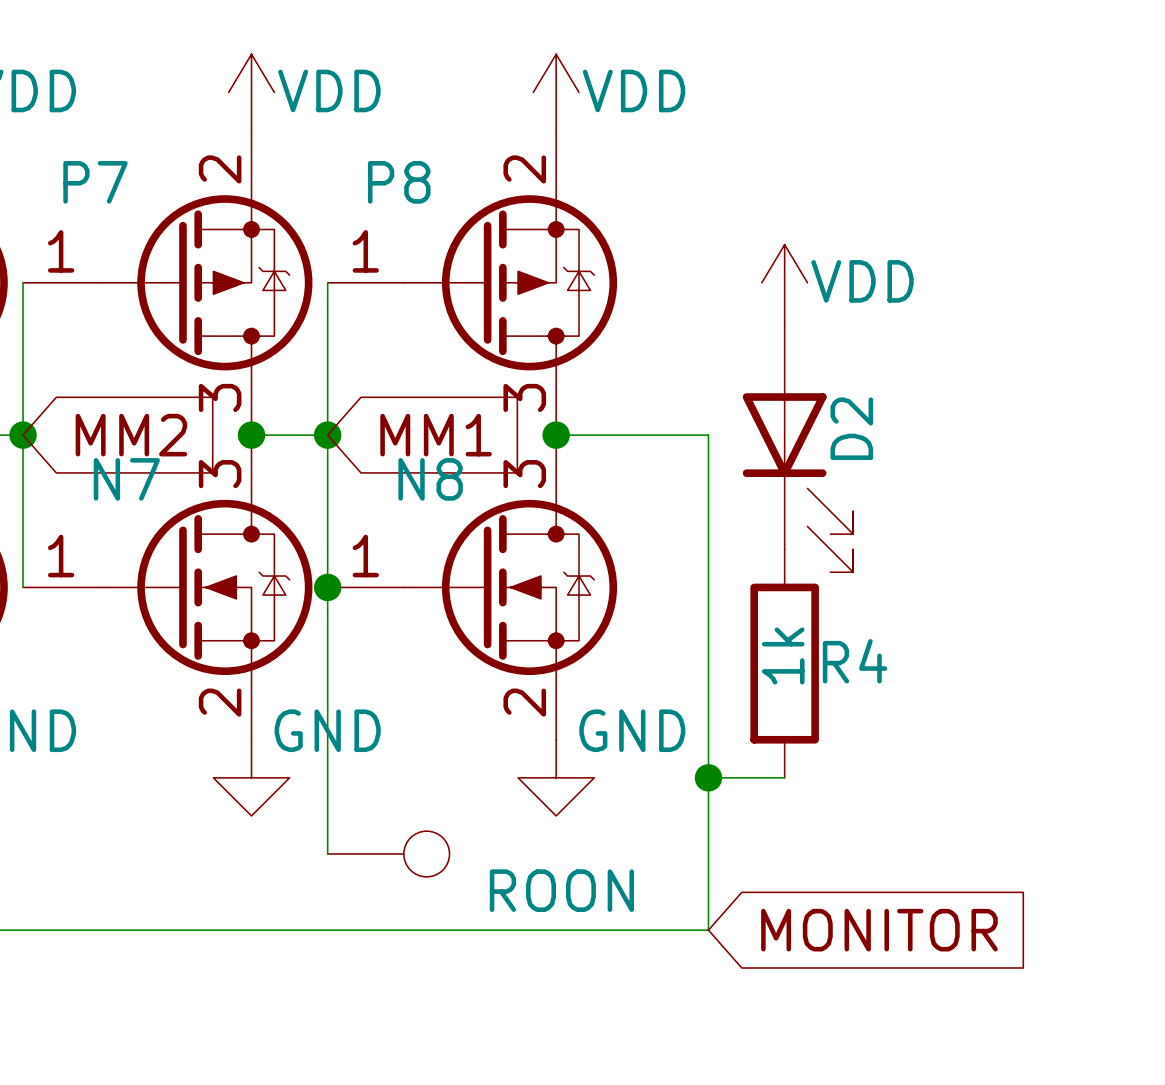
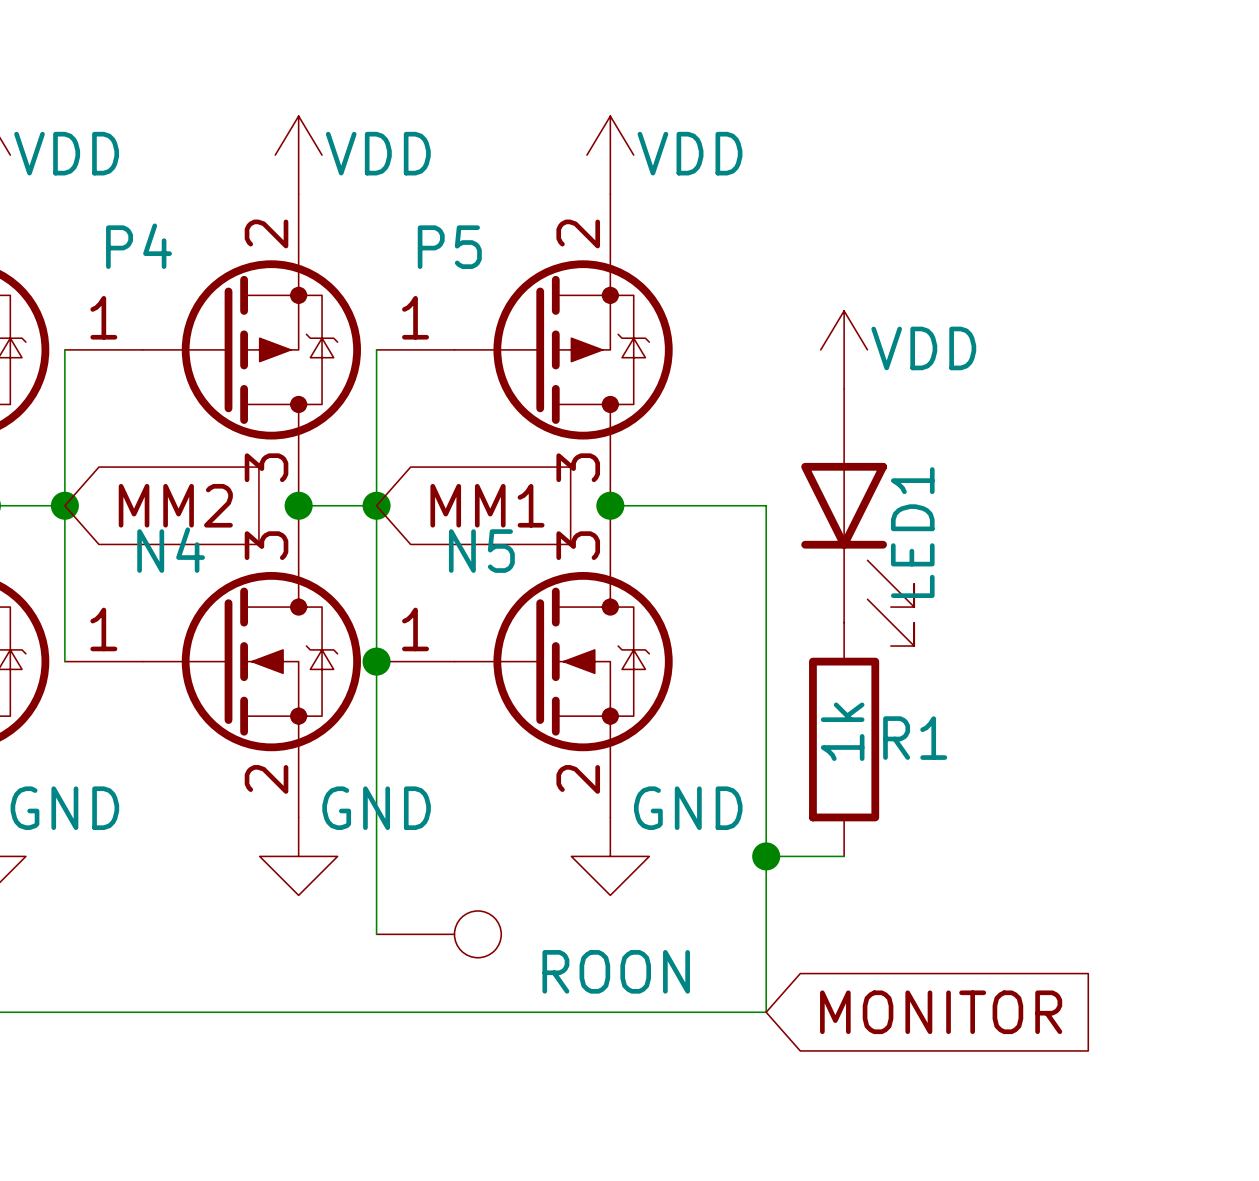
P7 name: P7 (95, 182) -> P4 (139, 246)
P8 name: P8 (399, 182) -> P5 (449, 247)
D2 name: D2 (851, 428) -> LED1 (912, 532)
N7 name: N7 (126, 479) -> N4 (171, 550)
N8 name: N8 (430, 479) -> N5 (481, 551)
R4 name: R4 (855, 661) -> R1 (915, 738)

